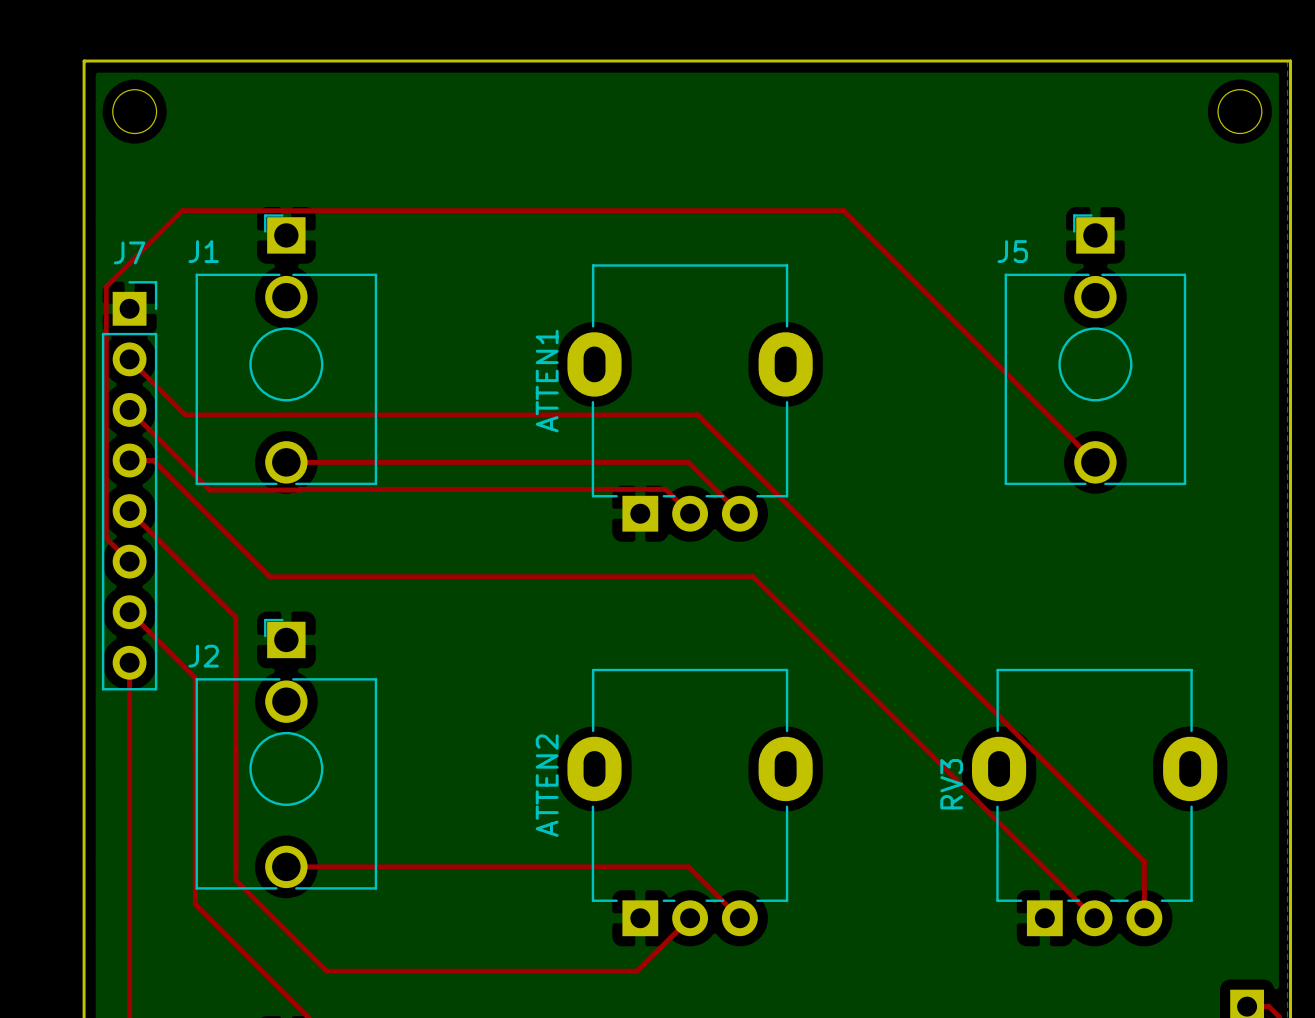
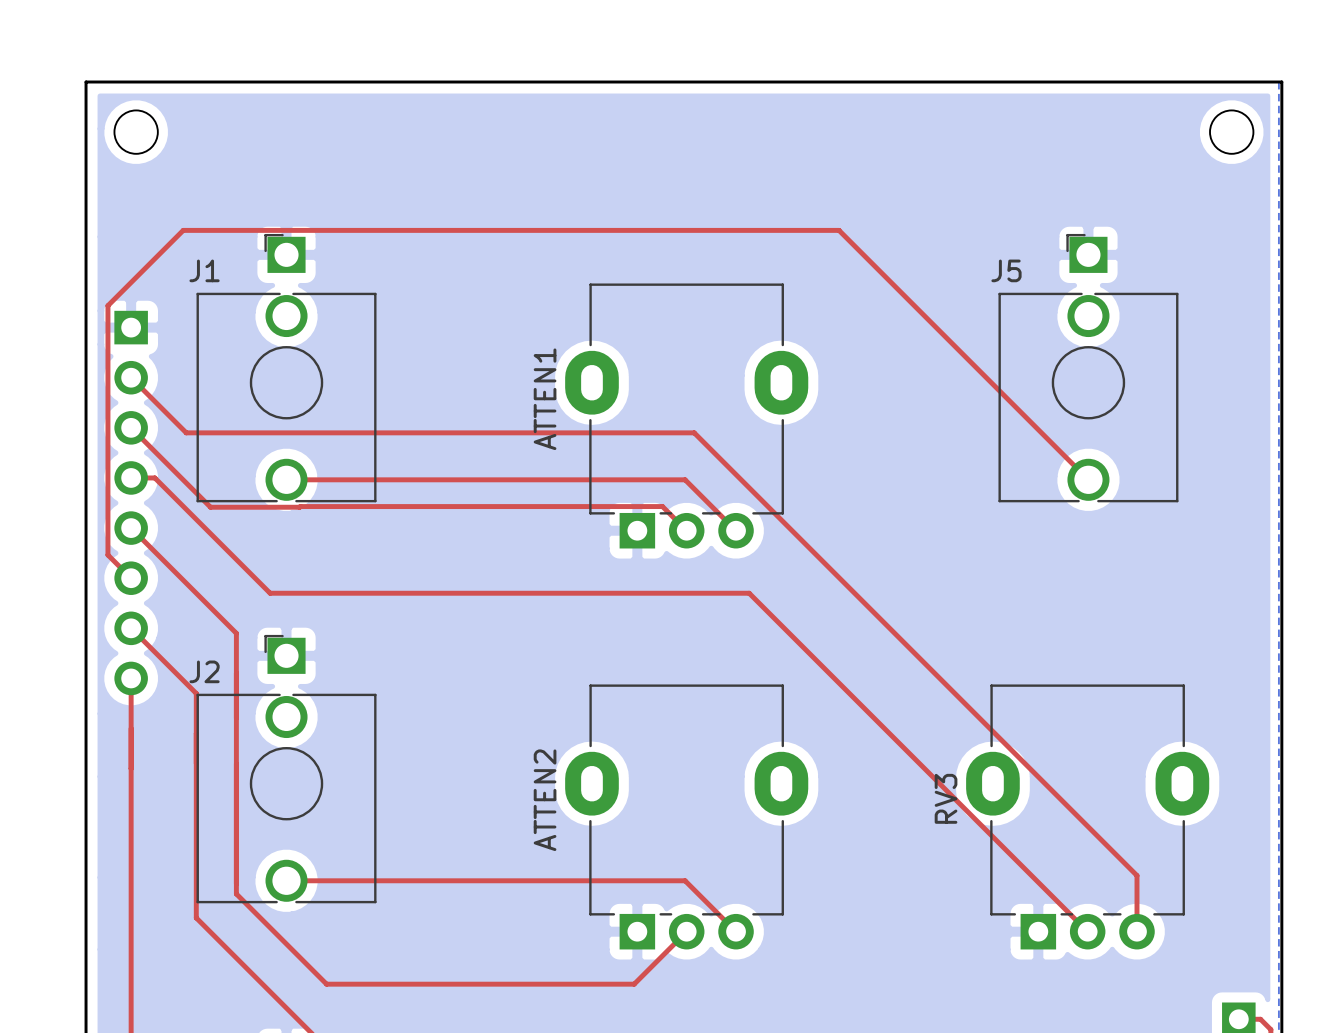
J7 side: top (129, 485) -> bottom (131, 503)

